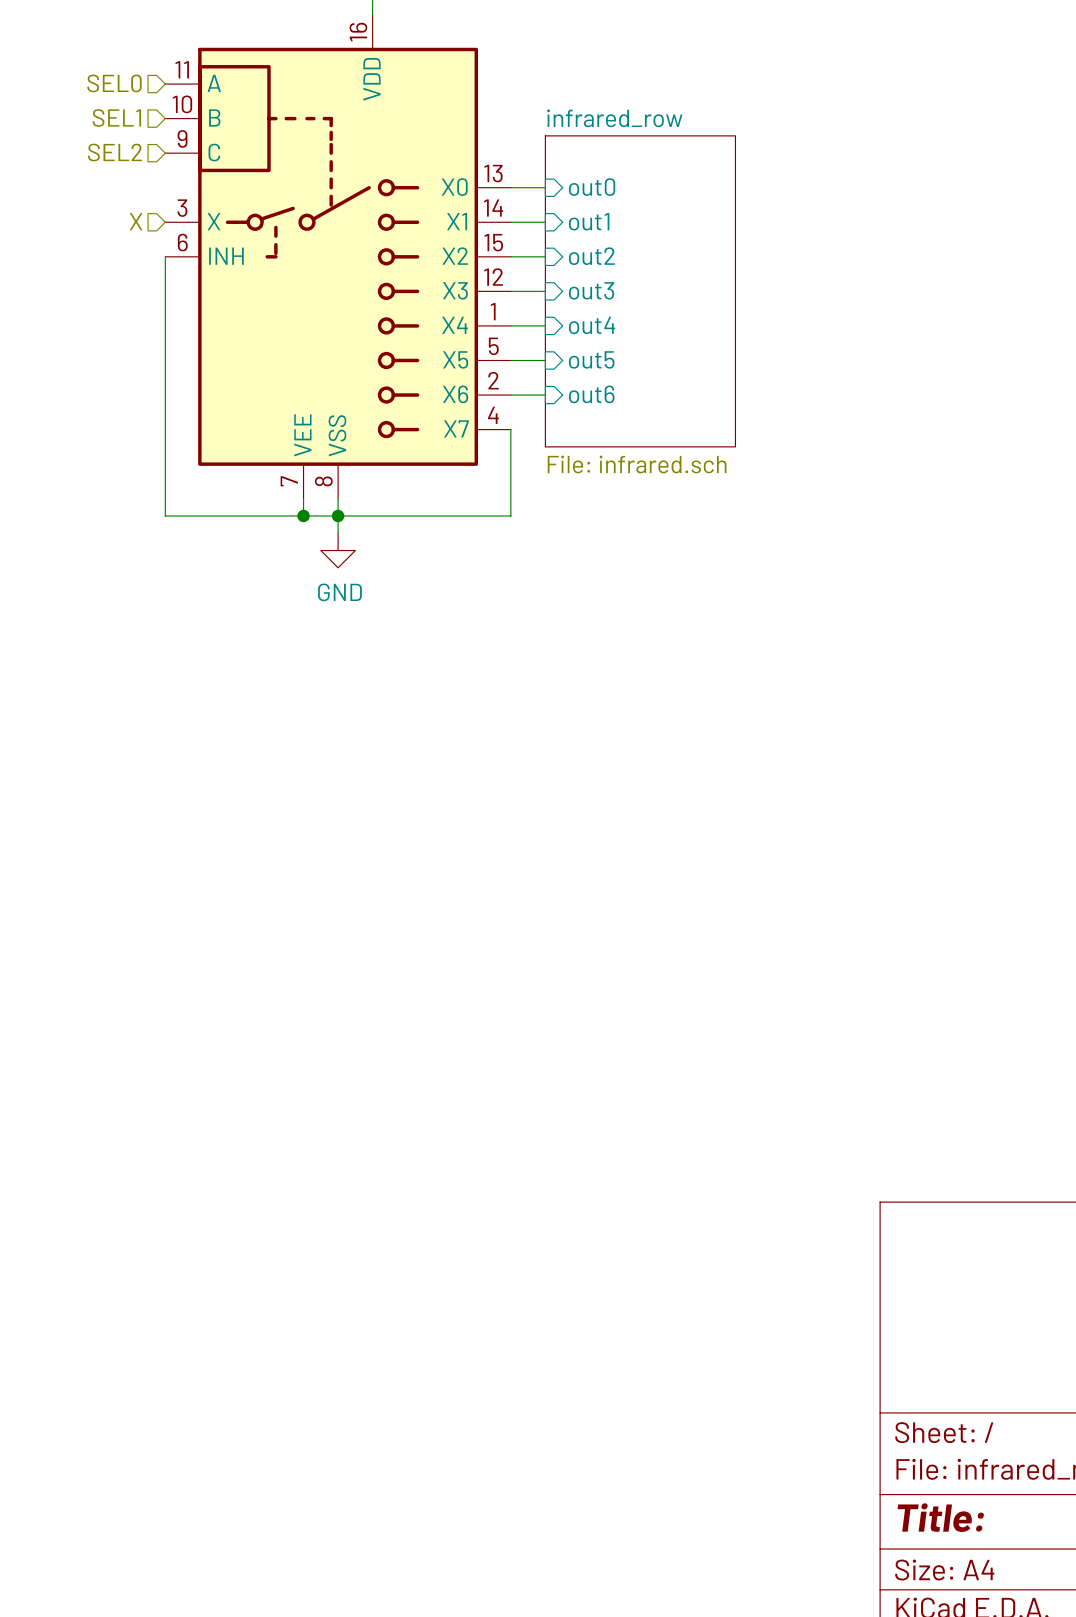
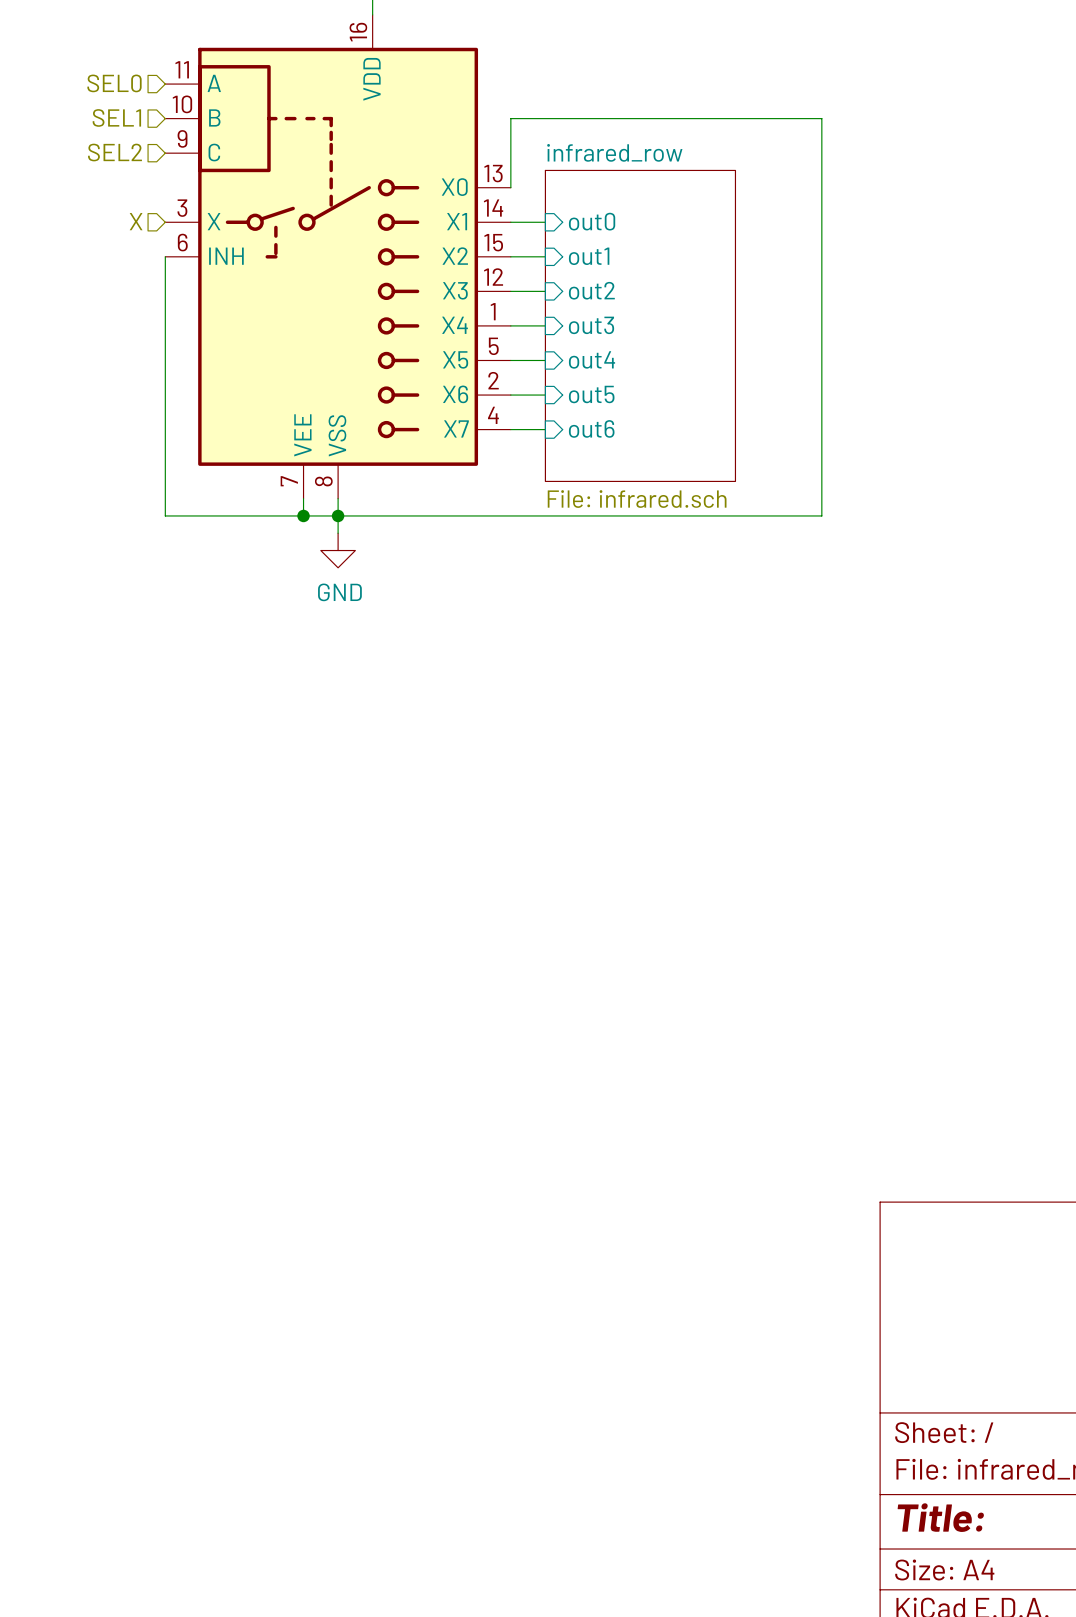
wire: (510, 187) (545, 187) -> (510, 187) (510, 118) (821, 118) (821, 515) (510, 515)
sheet pin: out0 (592, 187) -> none
sheet pin: out1 (589, 221) -> out0 (592, 221)
sheet pin: out2 (591, 256) -> out1 (589, 256)
sheet pin: out3 (591, 290) -> out2 (591, 290)
sheet infrared_row position: (640, 291) -> (640, 325)
sheet pin: out4 (592, 325) -> out3 (591, 325)
sheet pin: out5 (591, 359) -> out4 (592, 359)
sheet pin: out6 (591, 394) -> out5 (591, 394)
sheet pin: none -> out6 (591, 428)
wire: (510, 429) (510, 515) -> (510, 429) (545, 429)

